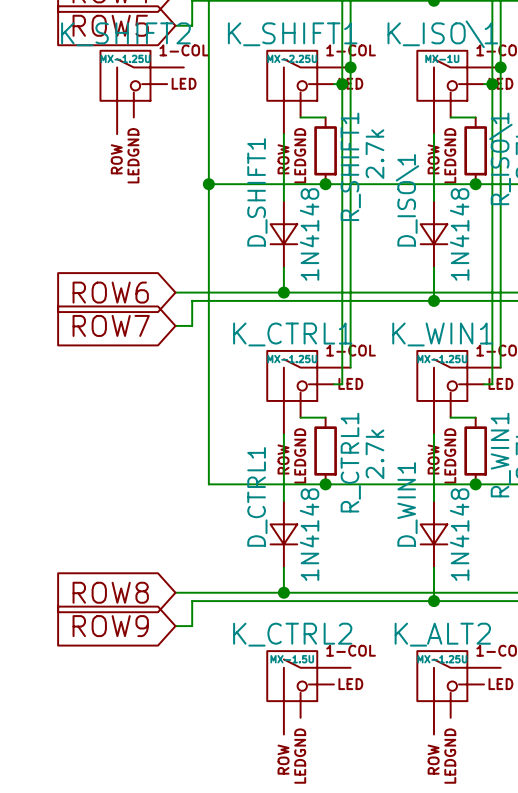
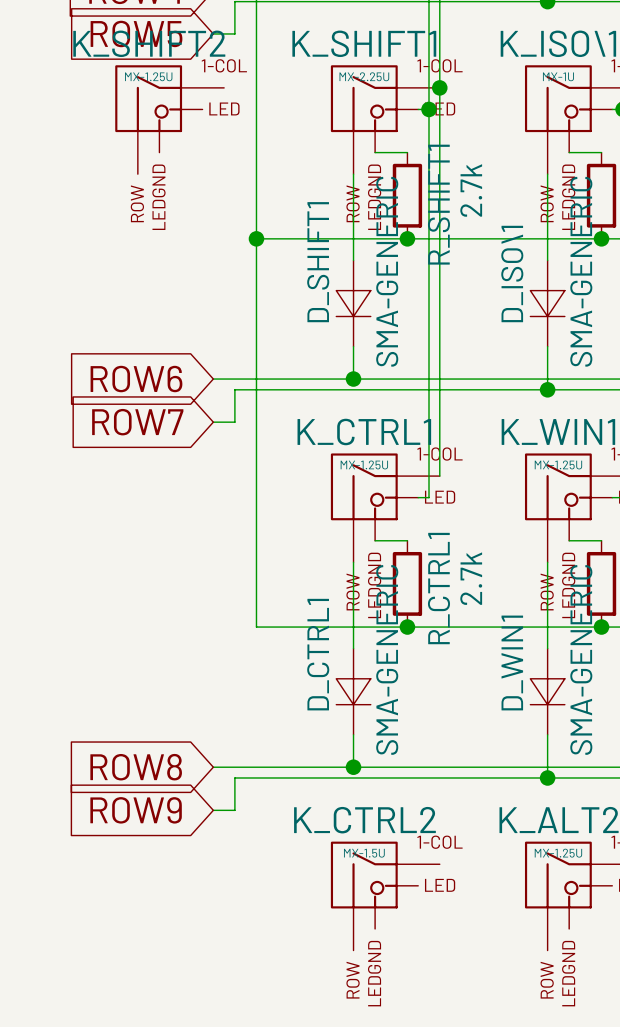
D_SHIFT1 value: 1N4148 (309, 234) -> SMA-GENERIC (387, 271)
D_ISO\1 value: 1N4148 (459, 234) -> SMA-GENERIC (581, 271)
D_CTRL1 value: 1N4148 (309, 534) -> SMA-GENERIC (387, 659)
D_WIN1 value: 1N4148 (459, 534) -> SMA-GENERIC (581, 659)

